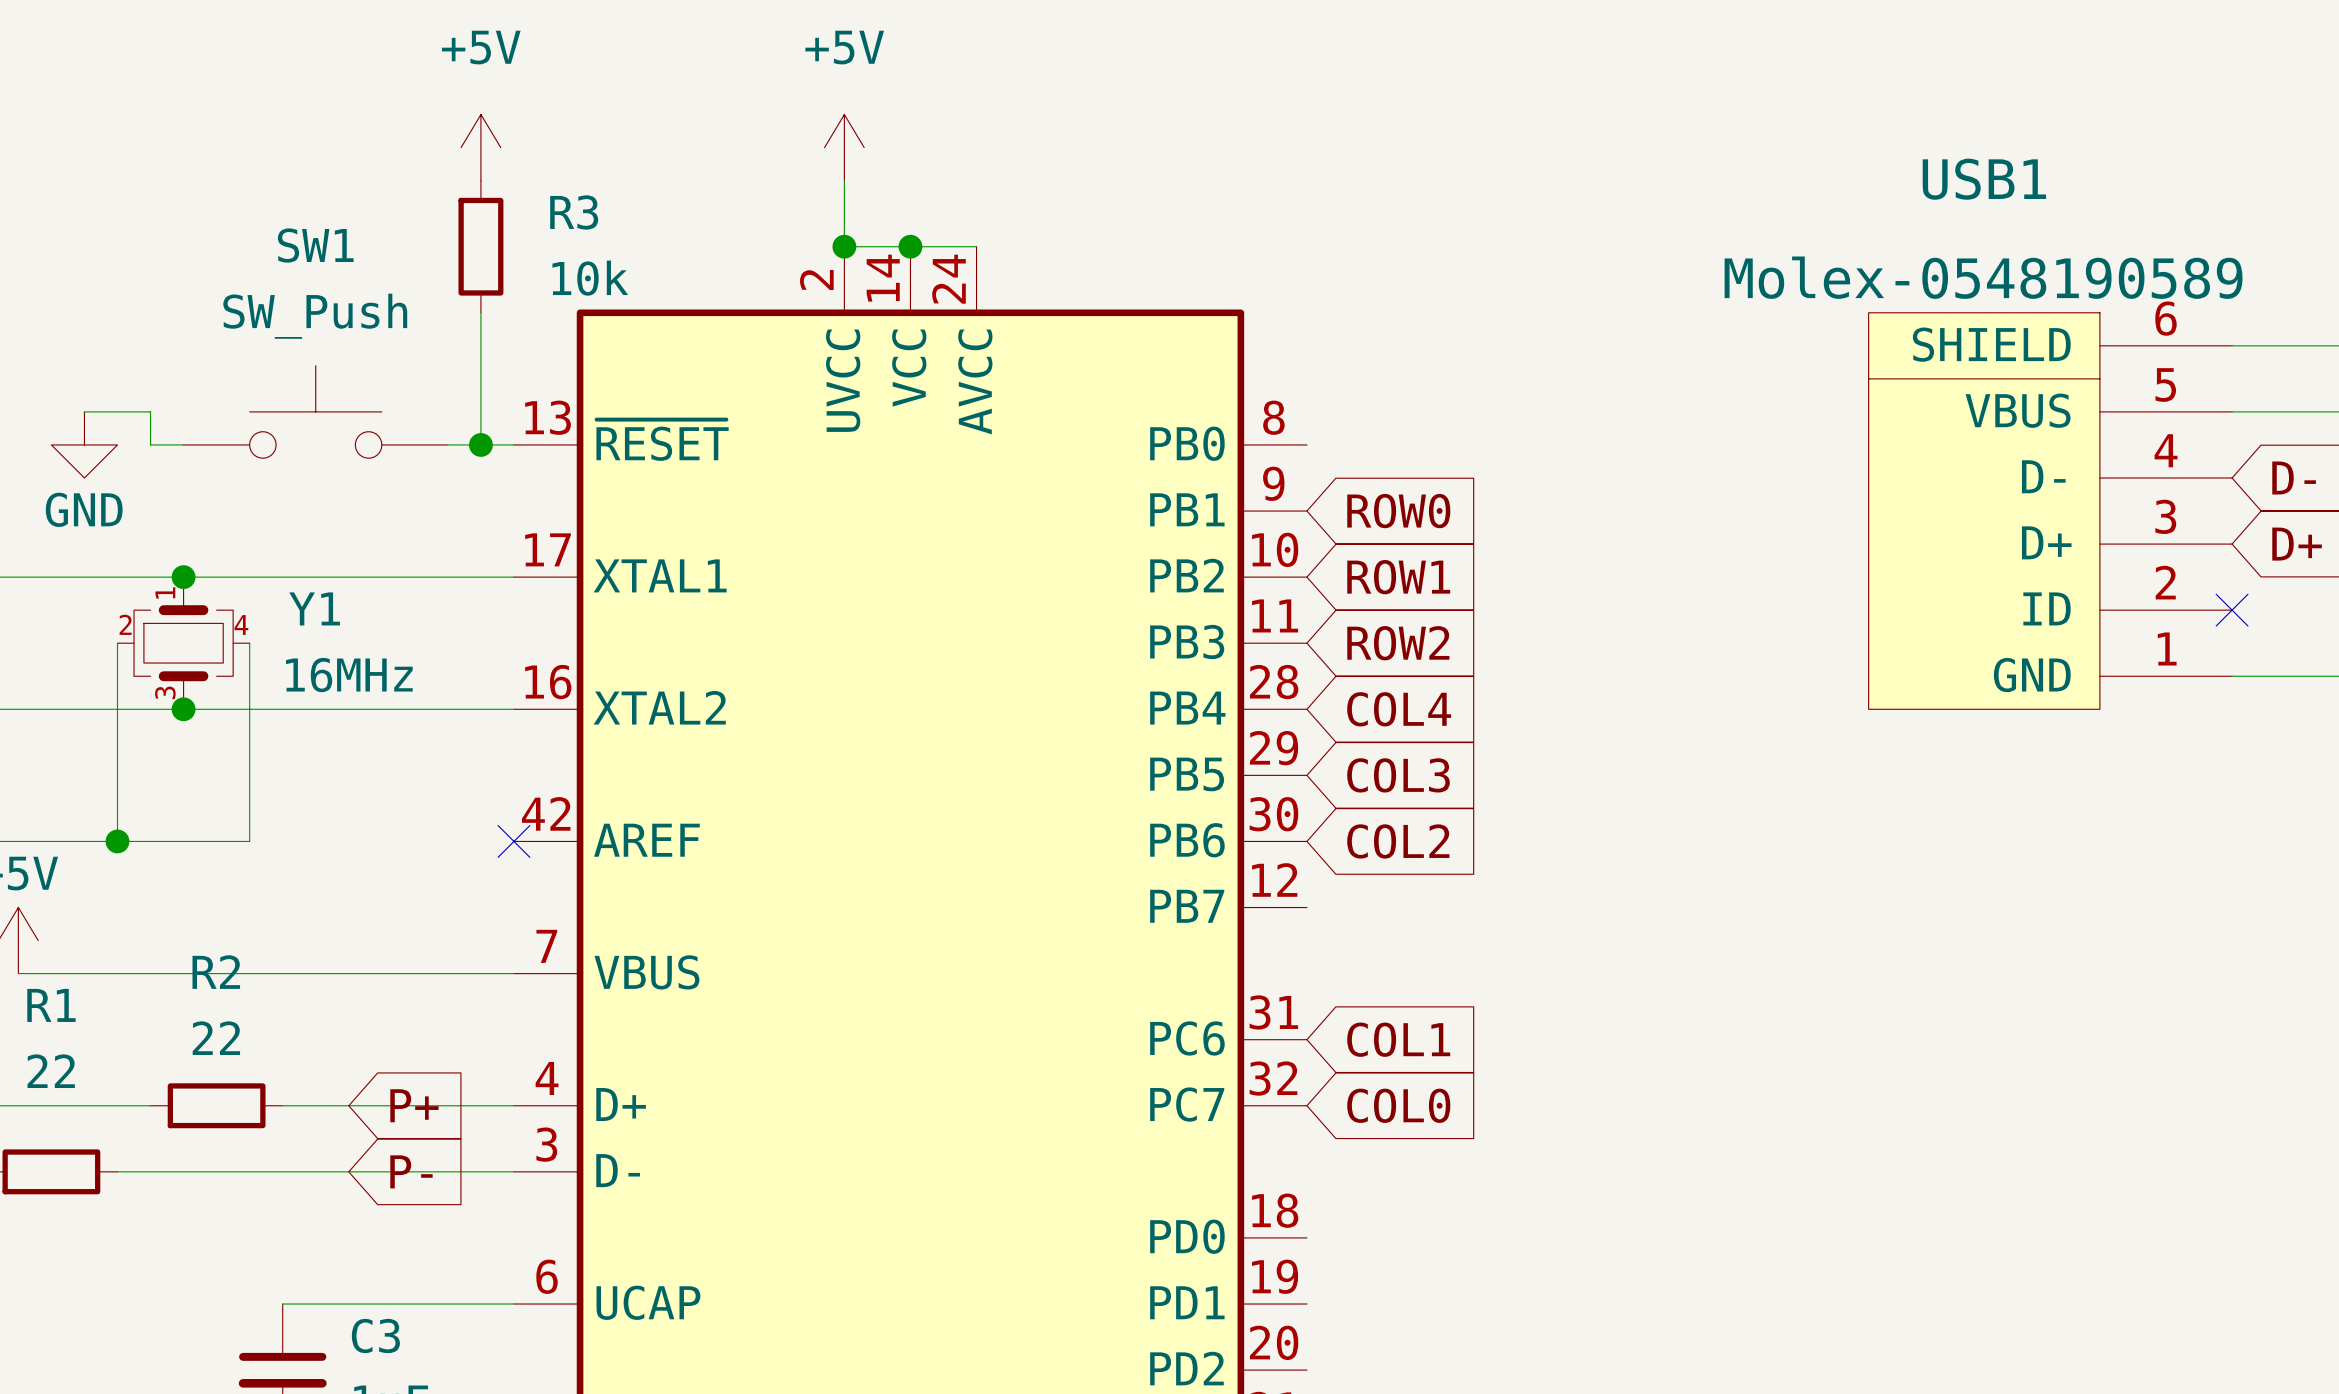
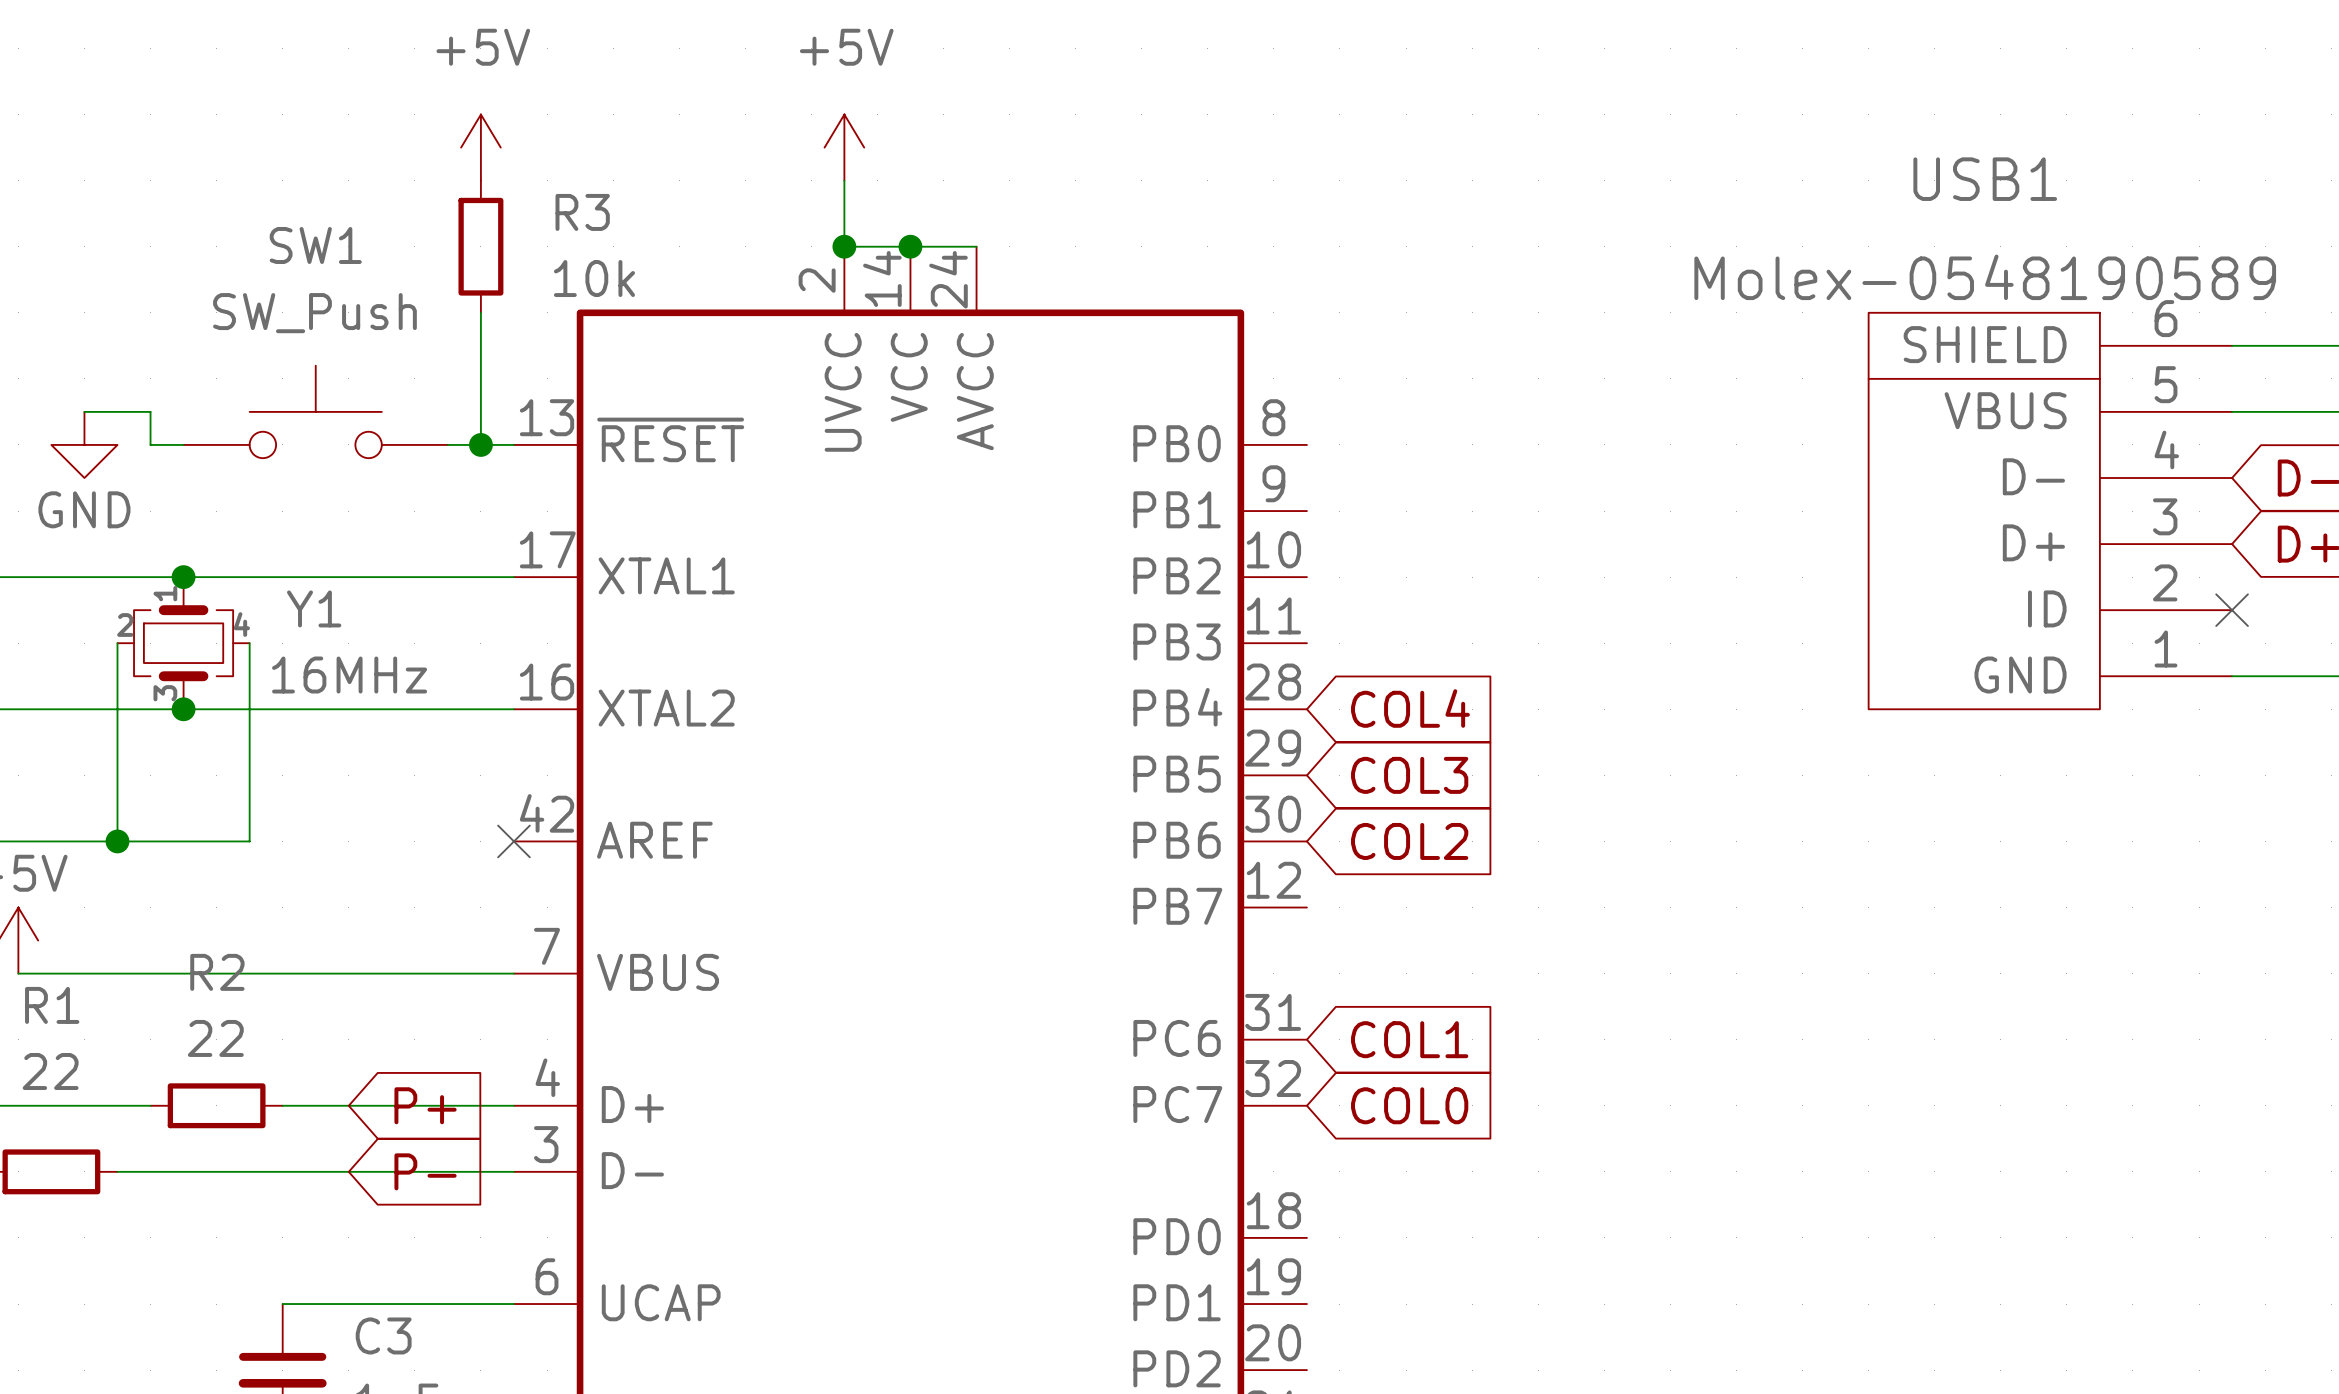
global label: ROW0 (1398, 511) -> none
global label: ROW1 (1398, 577) -> none
global label: ROW2 (1398, 643) -> none

